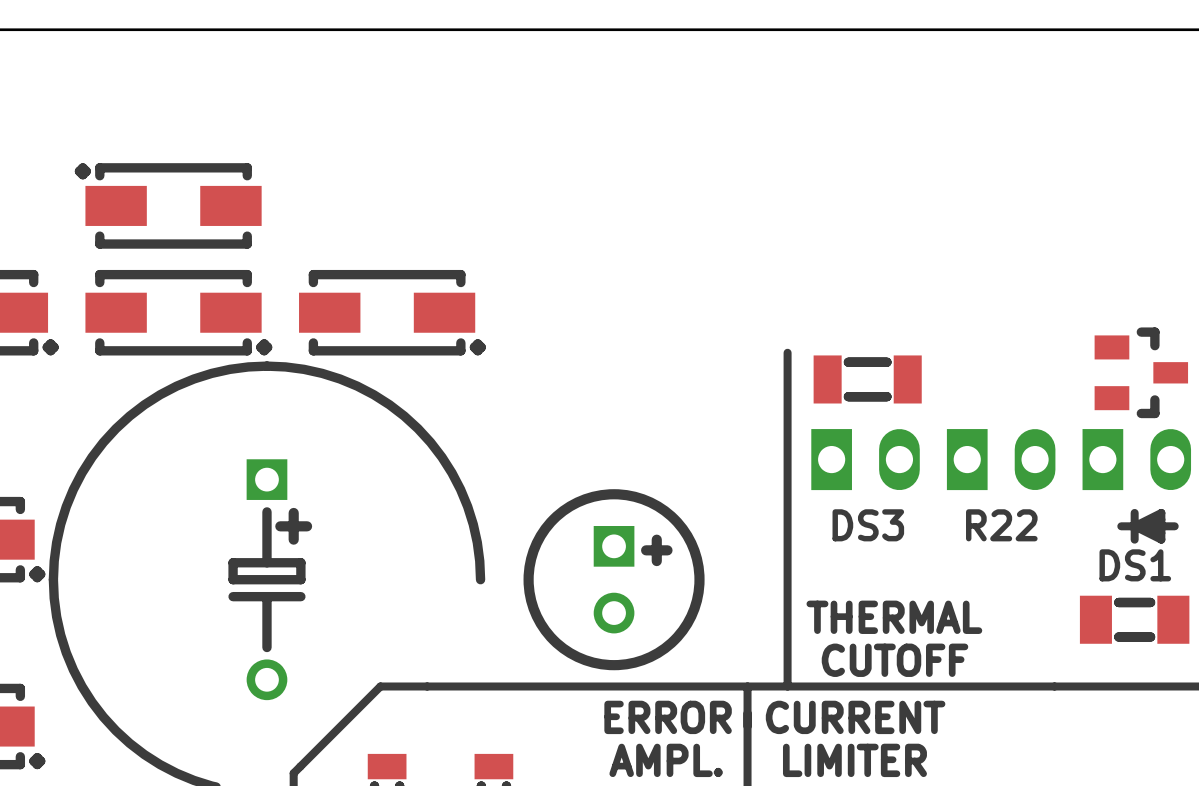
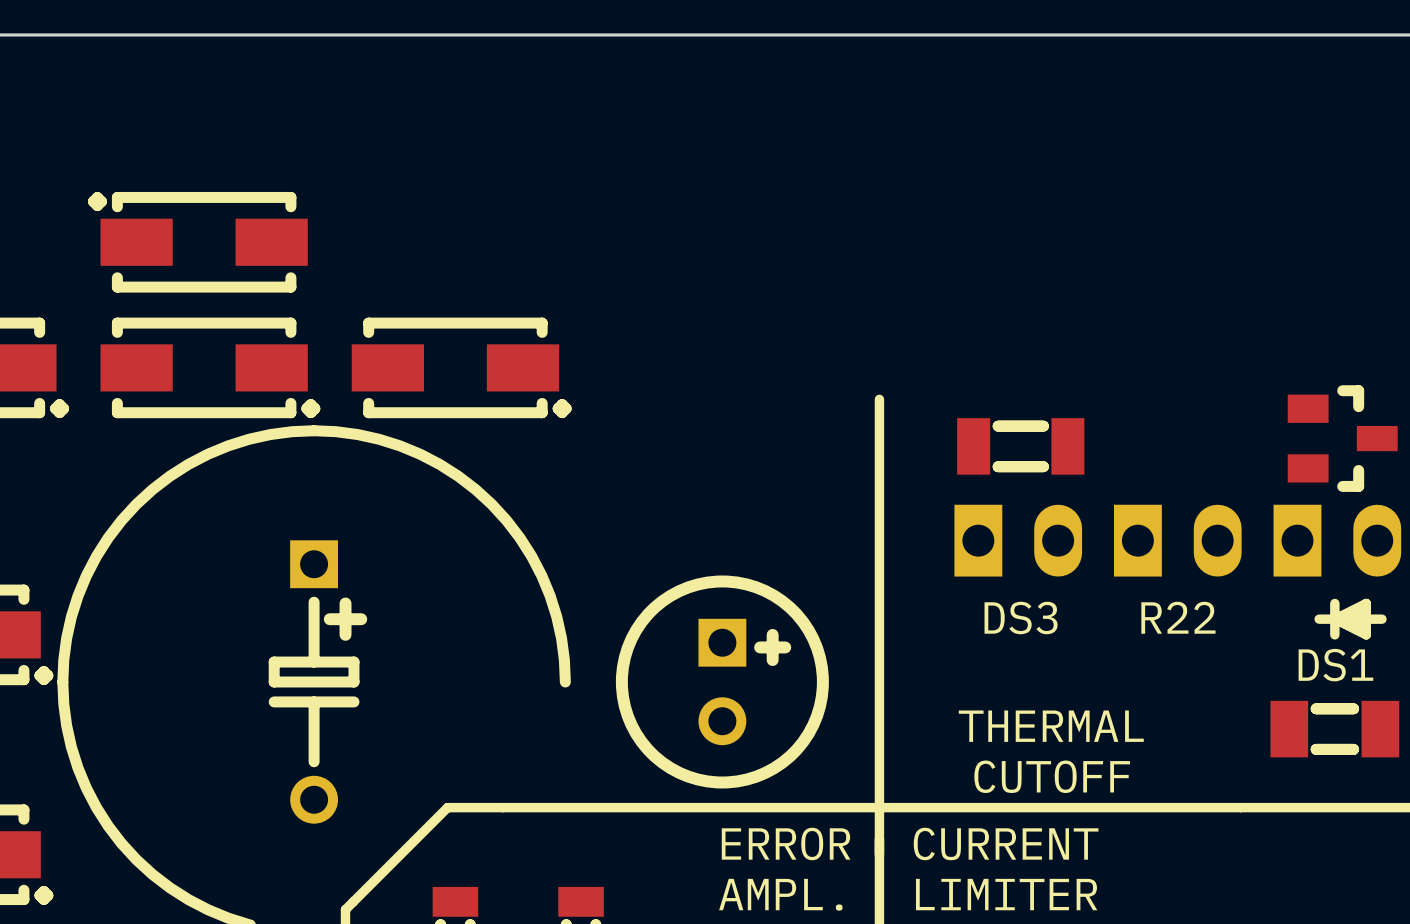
line: none -> (879, 399) (879, 807)
line: (787, 352) (787, 686) -> none

